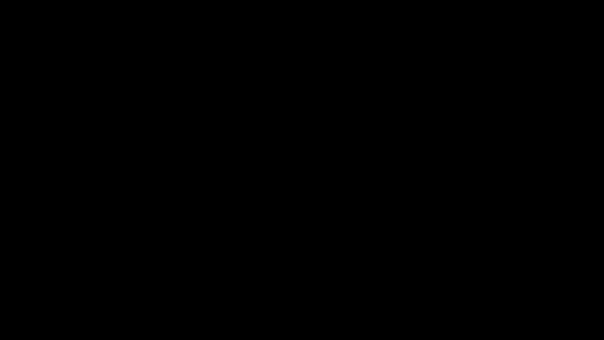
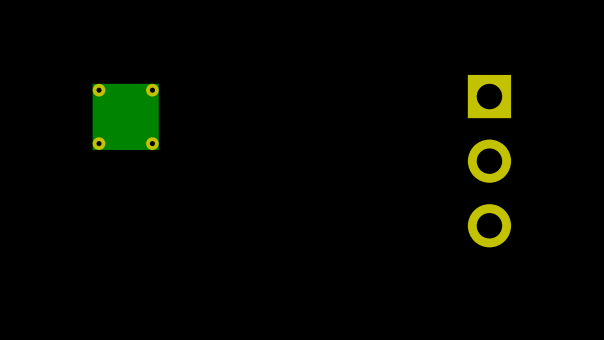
part: none -> (125, 116)
part: none -> (489, 161)

